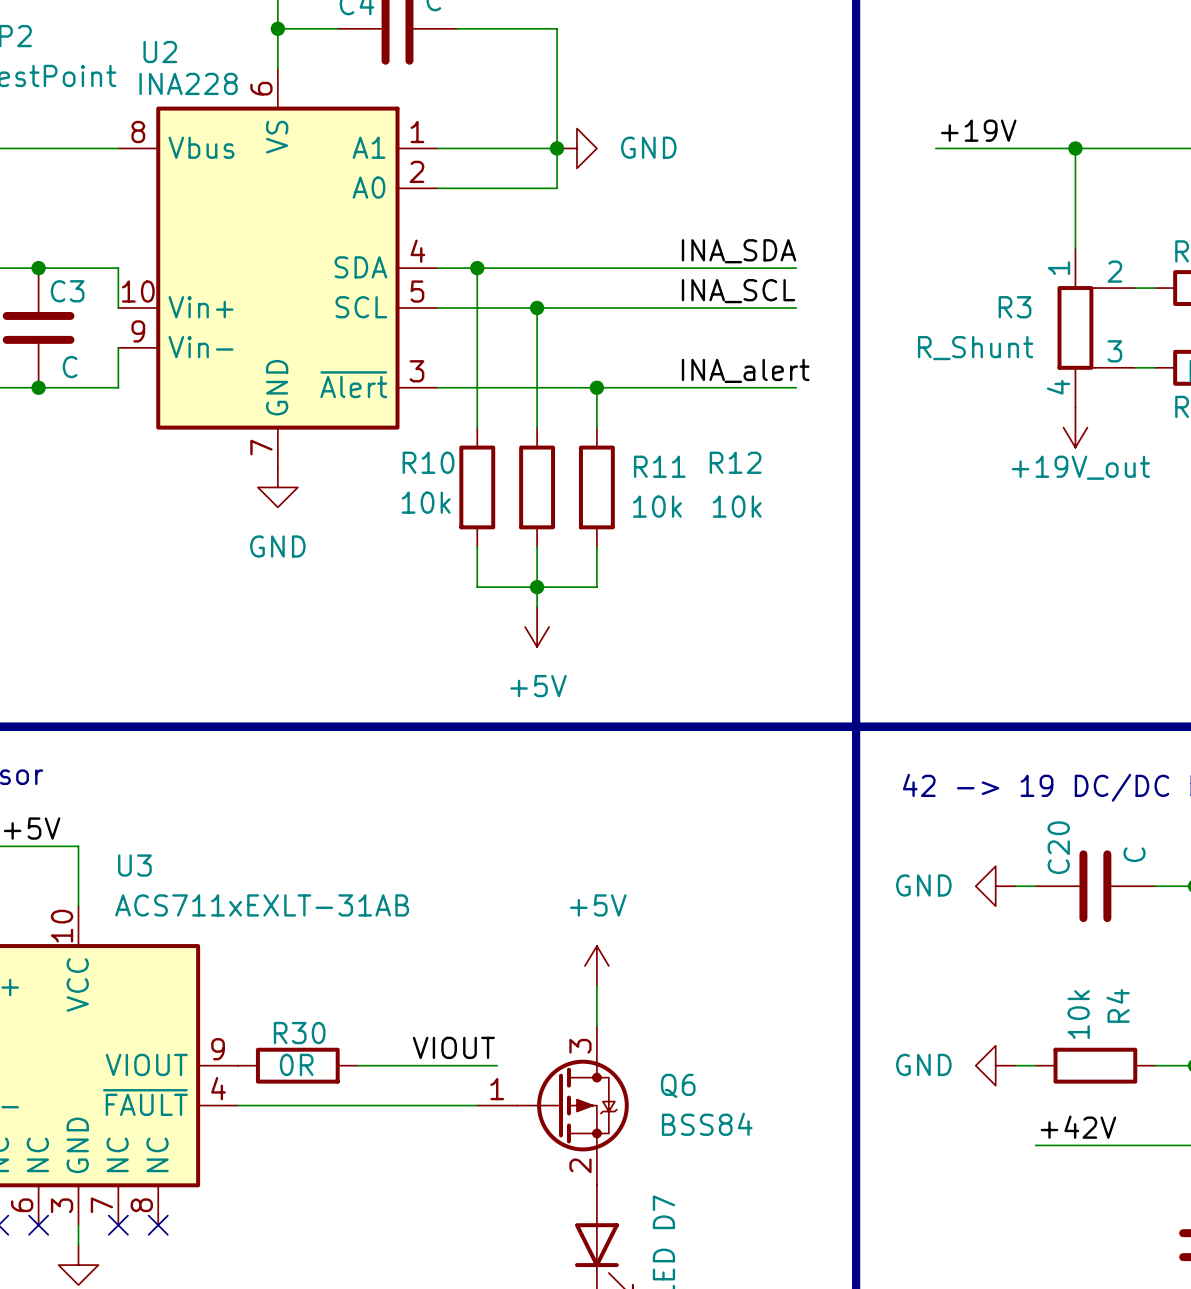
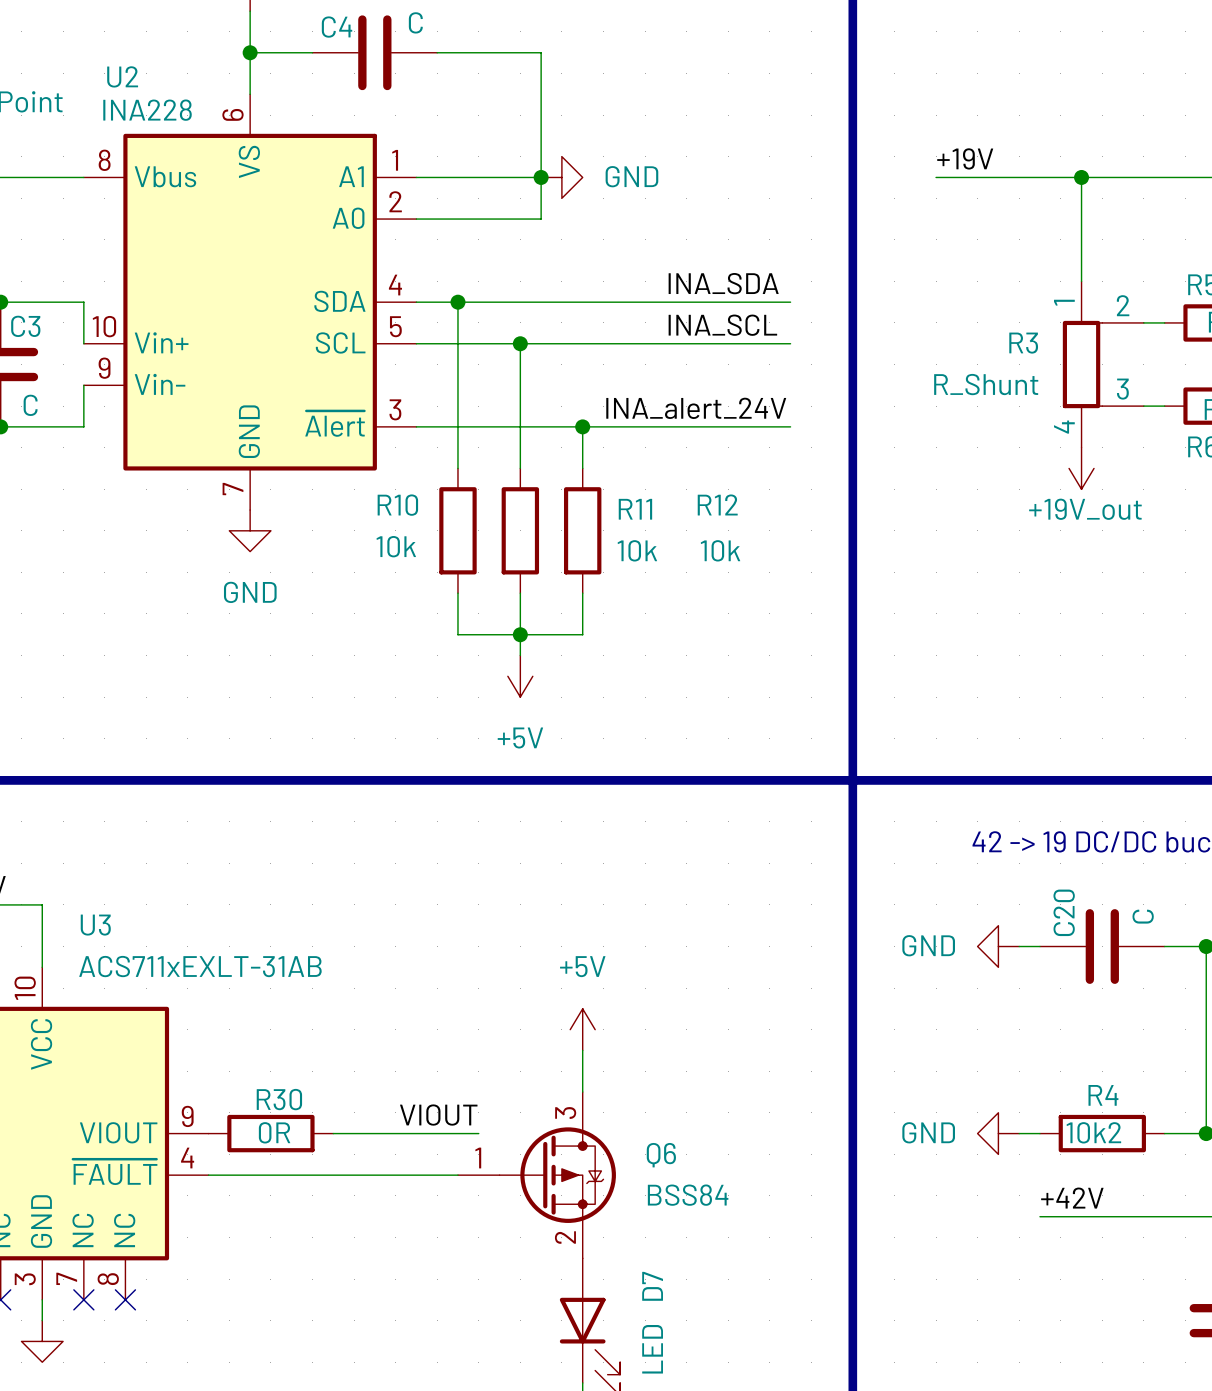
label: INA_alert (745, 370) -> INA_alert_24V (696, 408)
R4 name rotation: 0° (1118, 1006) -> 90° clockwise (1103, 1095)
R4 value: 10k (1078, 1014) -> 10k2 (1093, 1132)

